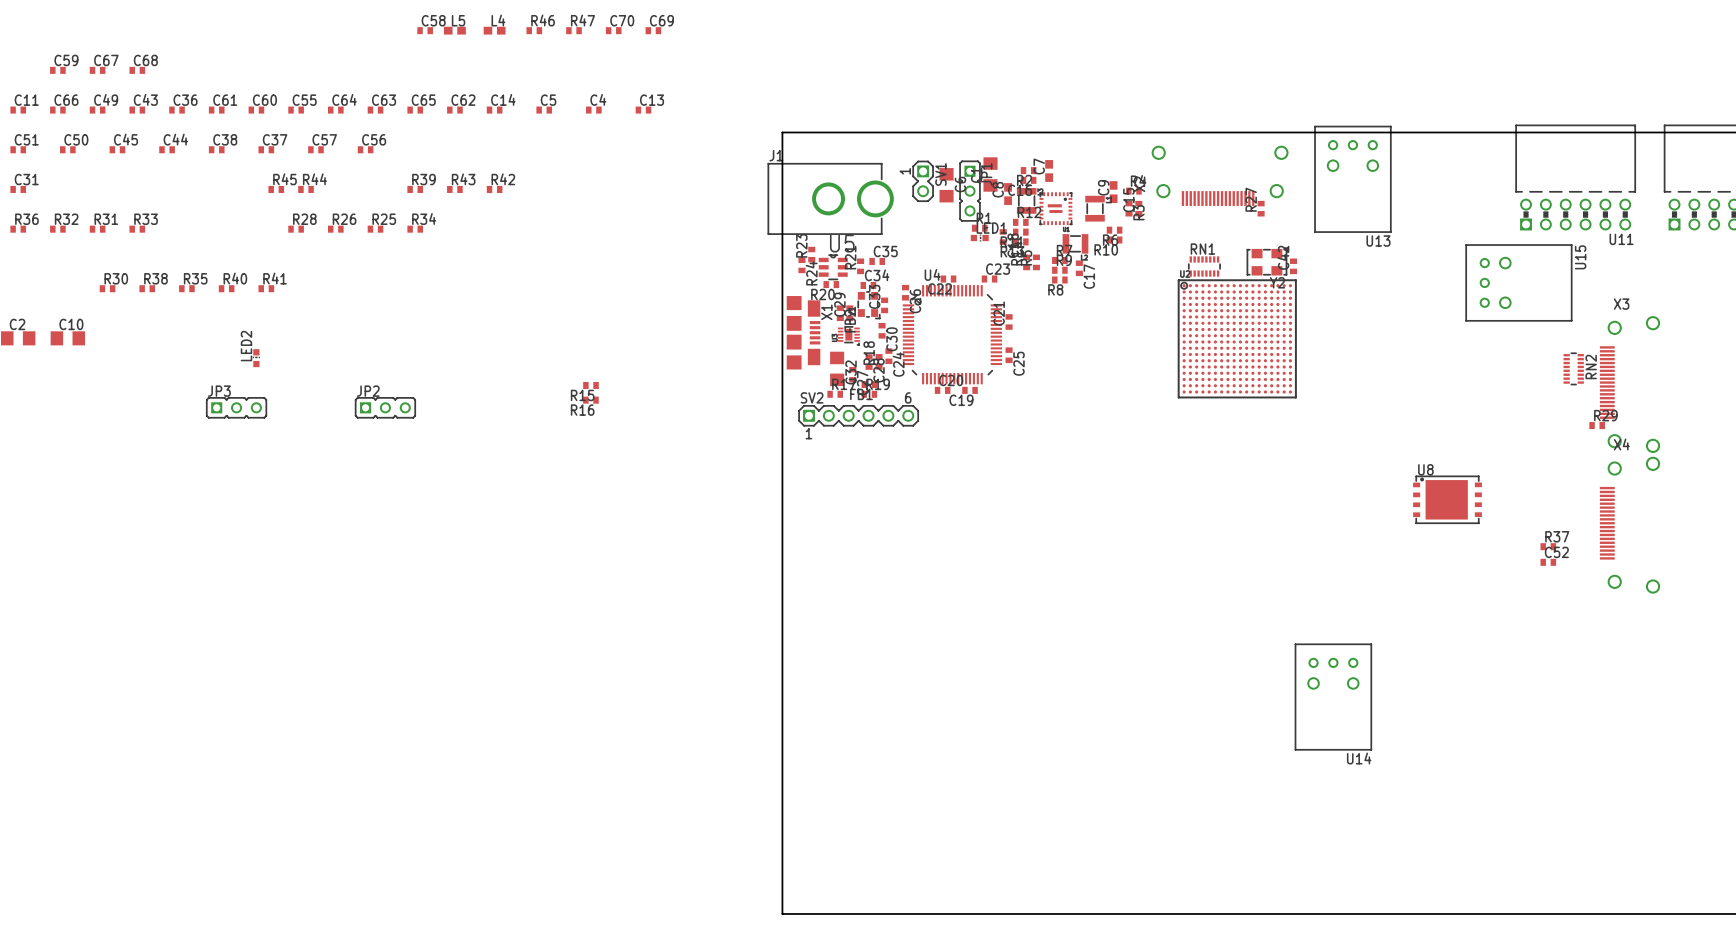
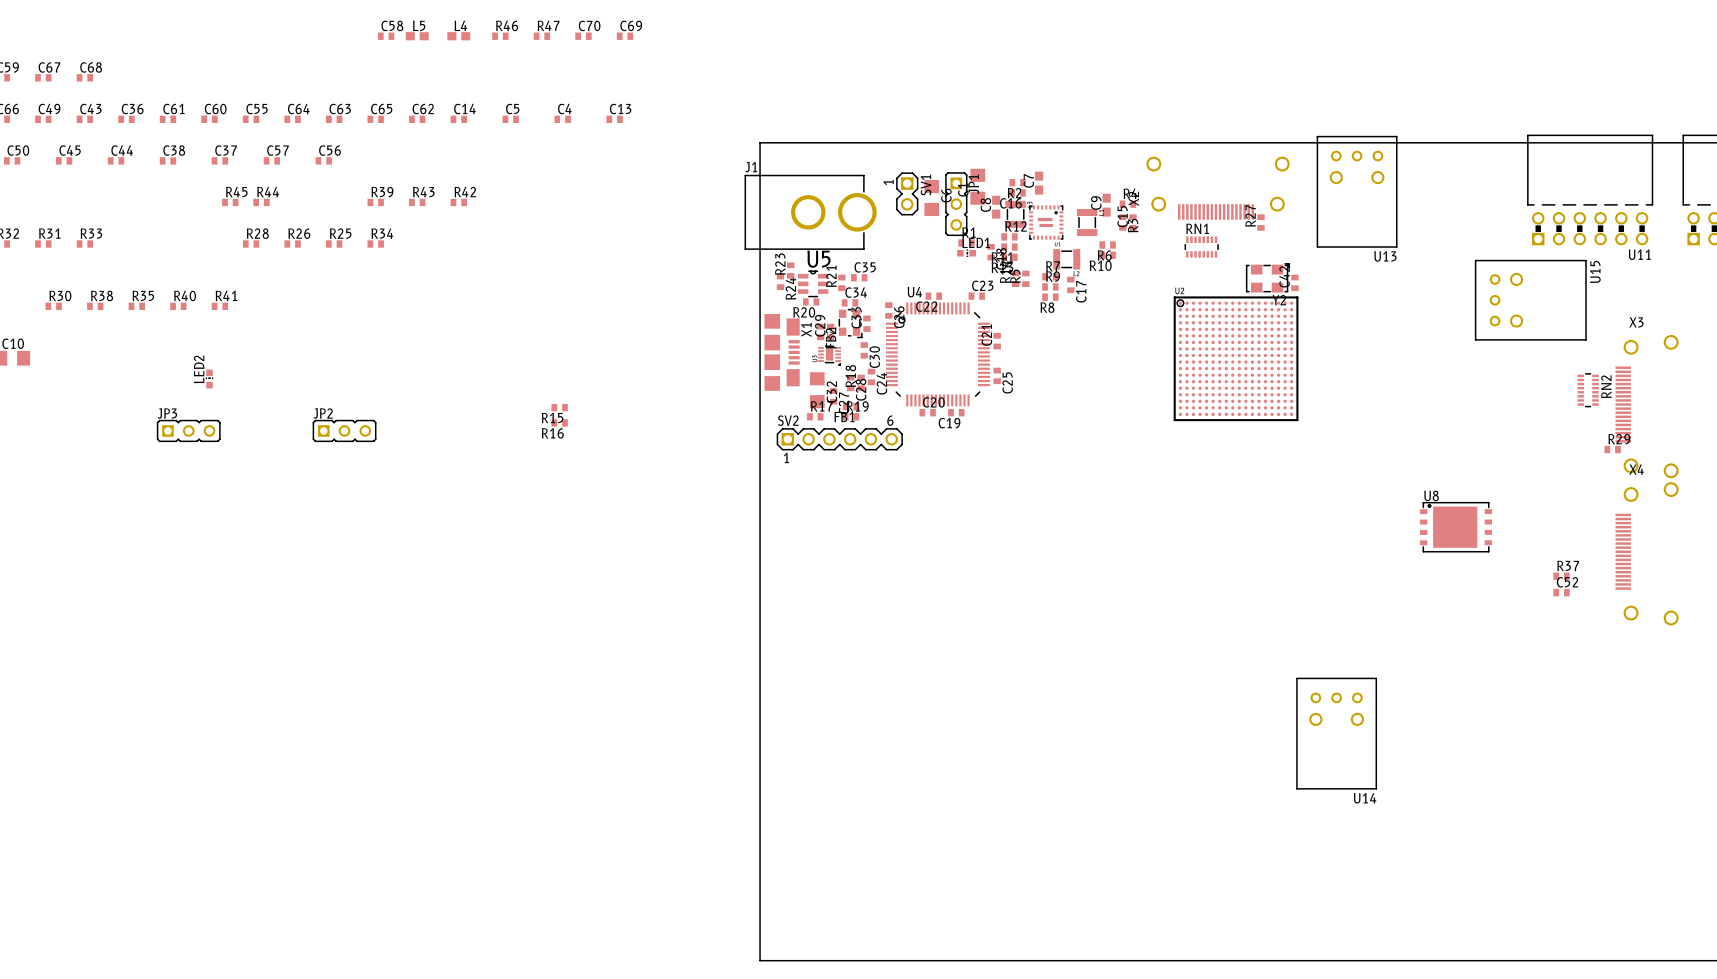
RN1 position: (1204, 266) -> (1201, 247)

